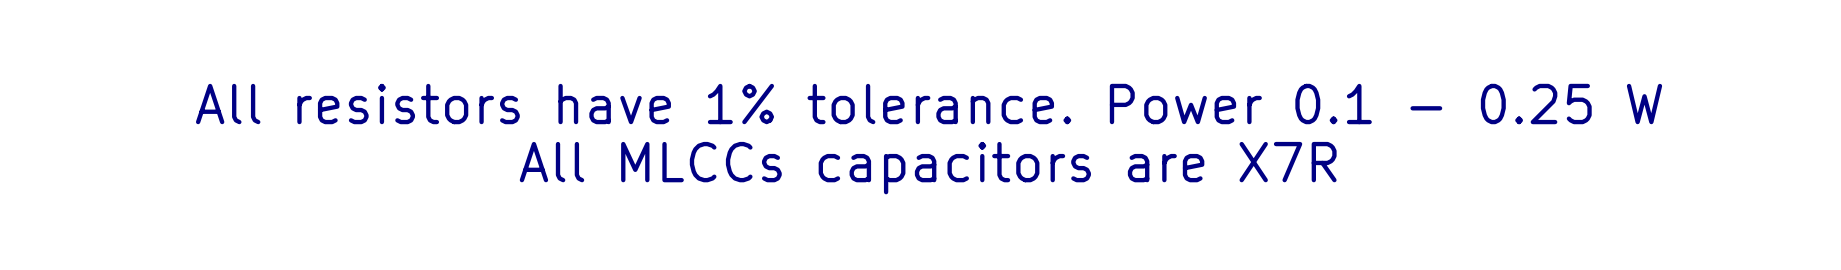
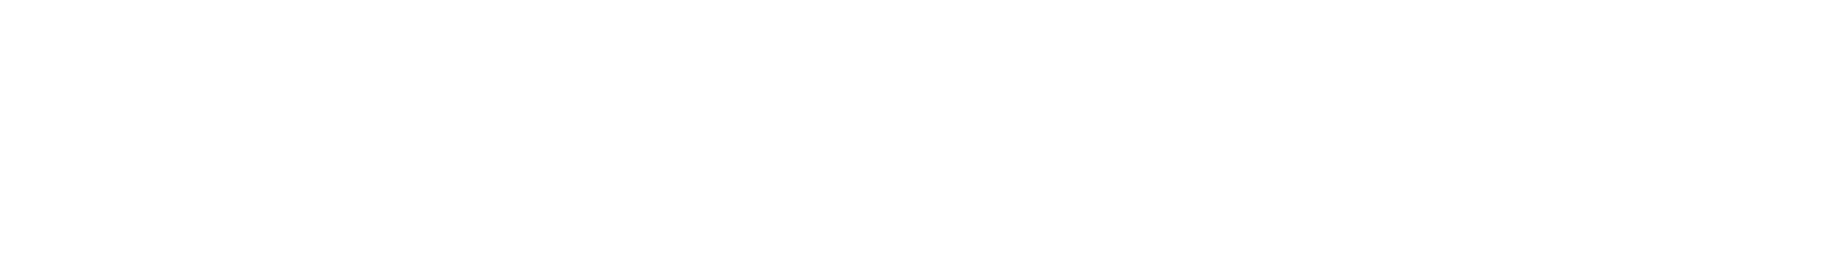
text: All resistors have 1% tolerance. Power 0.1 - 0.25 W (929, 104) -> none
text: All MLCCs capacitors are X7R (928, 168) -> none

